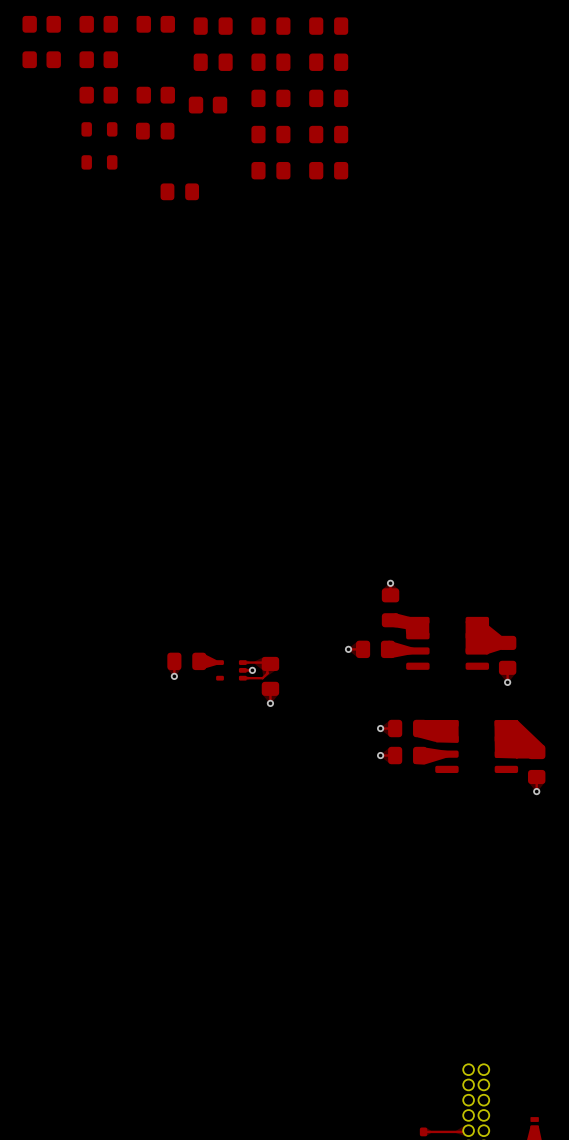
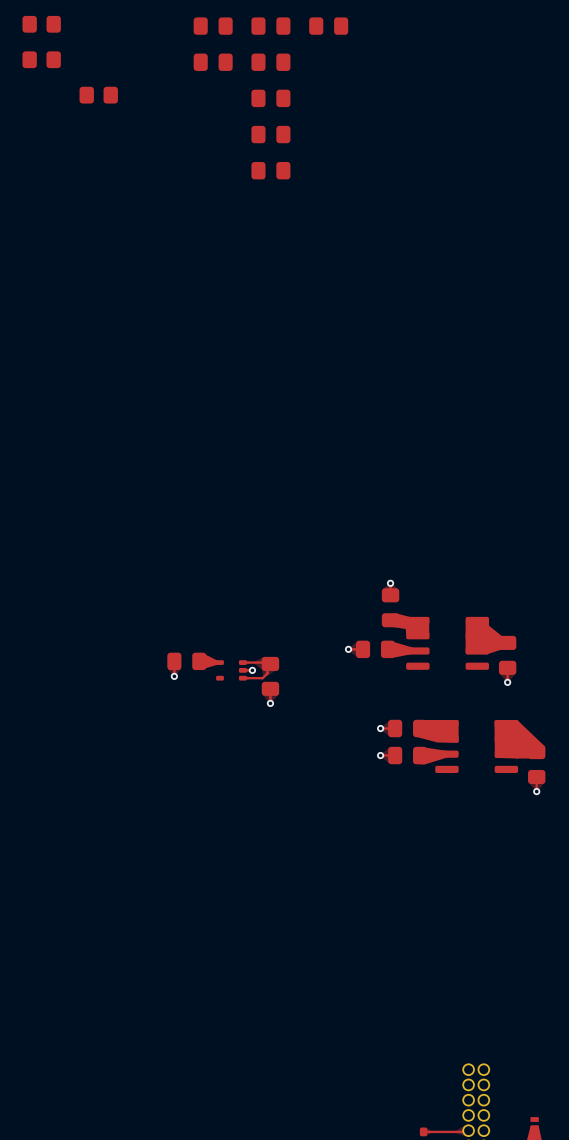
part: (98, 24) -> none
part: (155, 24) -> none
part: (98, 59) -> none
part: (328, 62) -> none
part: (155, 95) -> none
part: (328, 98) -> none
part: (208, 105) -> none
part: (99, 129) -> none
part: (155, 131) -> none
part: (328, 134) -> none
part: (99, 162) -> none
part: (328, 170) -> none
part: (179, 191) -> none

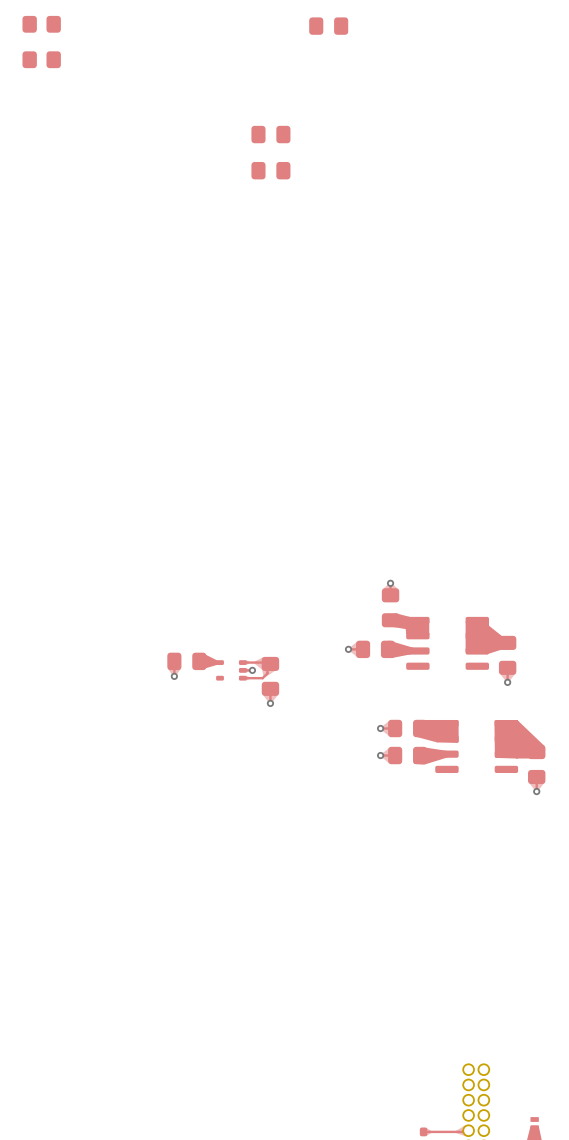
part: (213, 26) -> none
part: (270, 26) -> none
part: (213, 62) -> none
part: (270, 62) -> none
part: (98, 95) -> none
part: (270, 98) -> none

